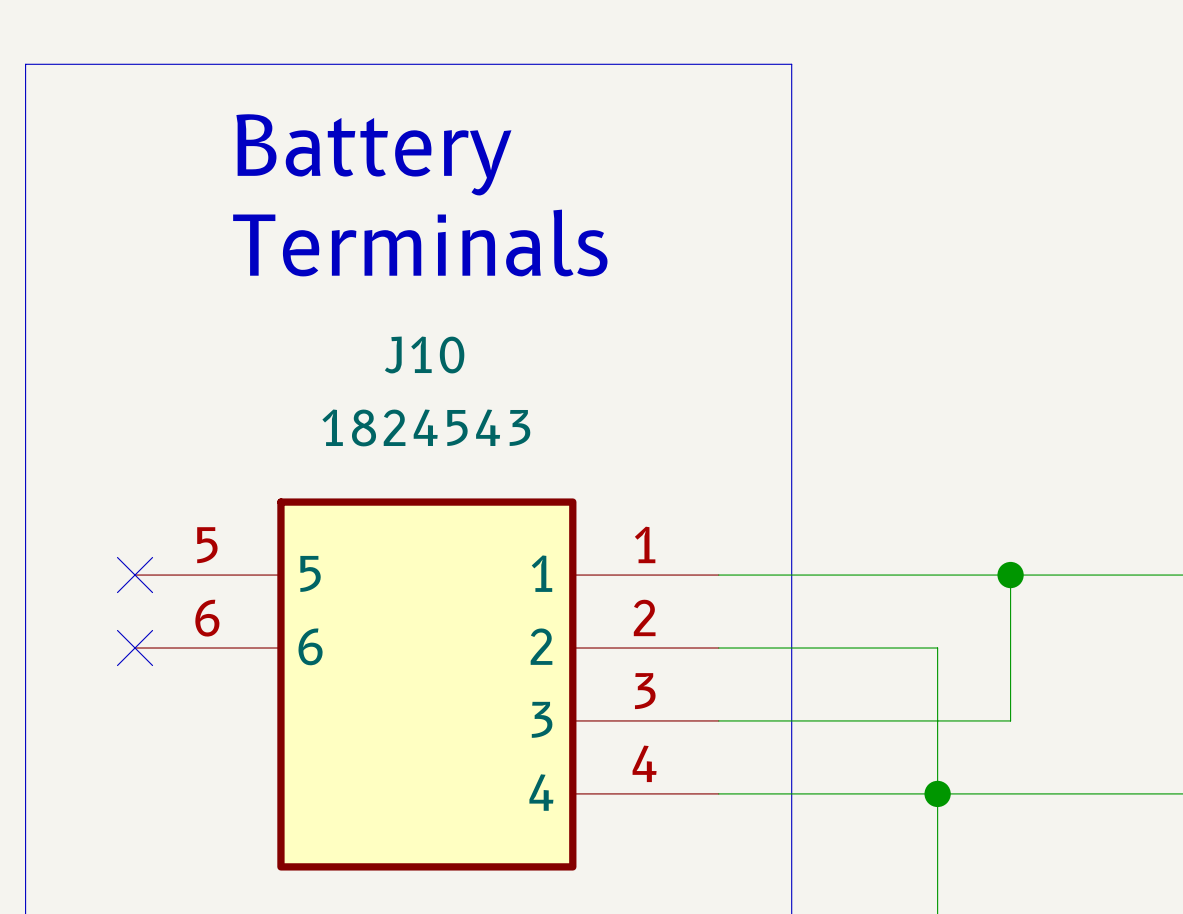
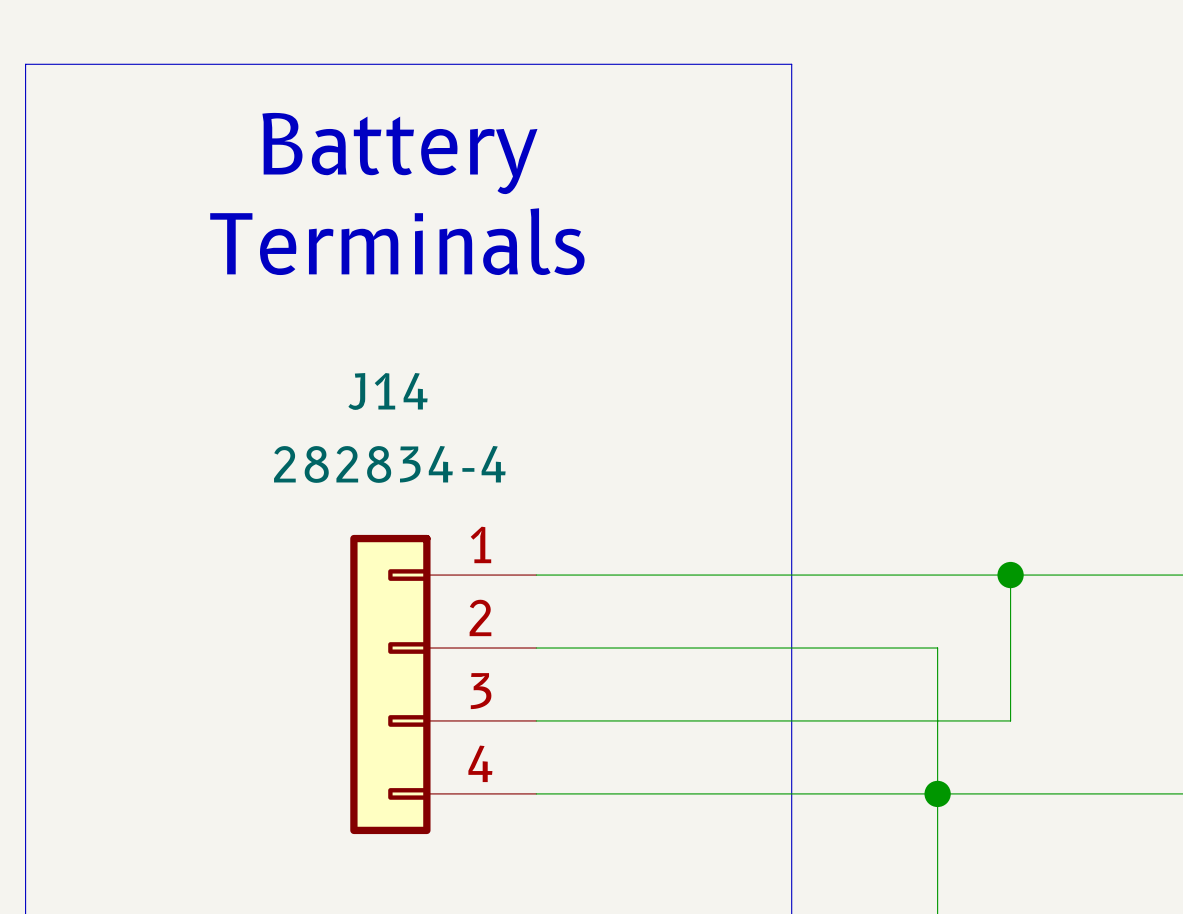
text position: Battery (373, 154) -> Battery (399, 153)
text position: Terminals (420, 243) -> Terminals (397, 241)
no-connect mark: (135, 575) -> none
no-connect mark: (135, 648) -> none
J10: 1824543 (426, 684) -> none
J14: none -> 282834-4 (443, 684)

